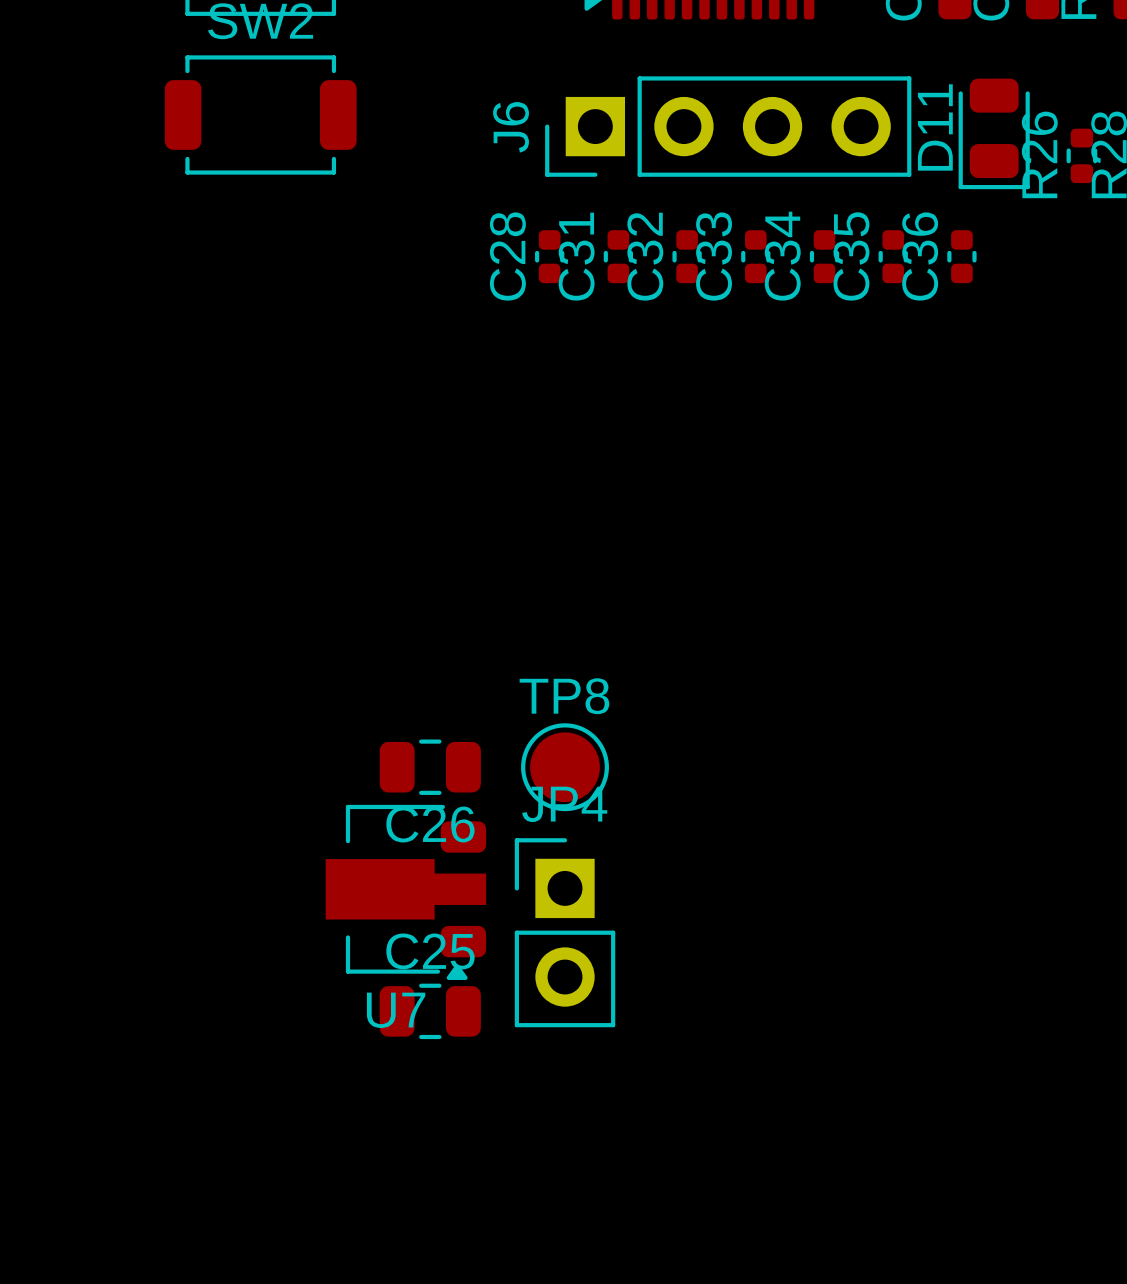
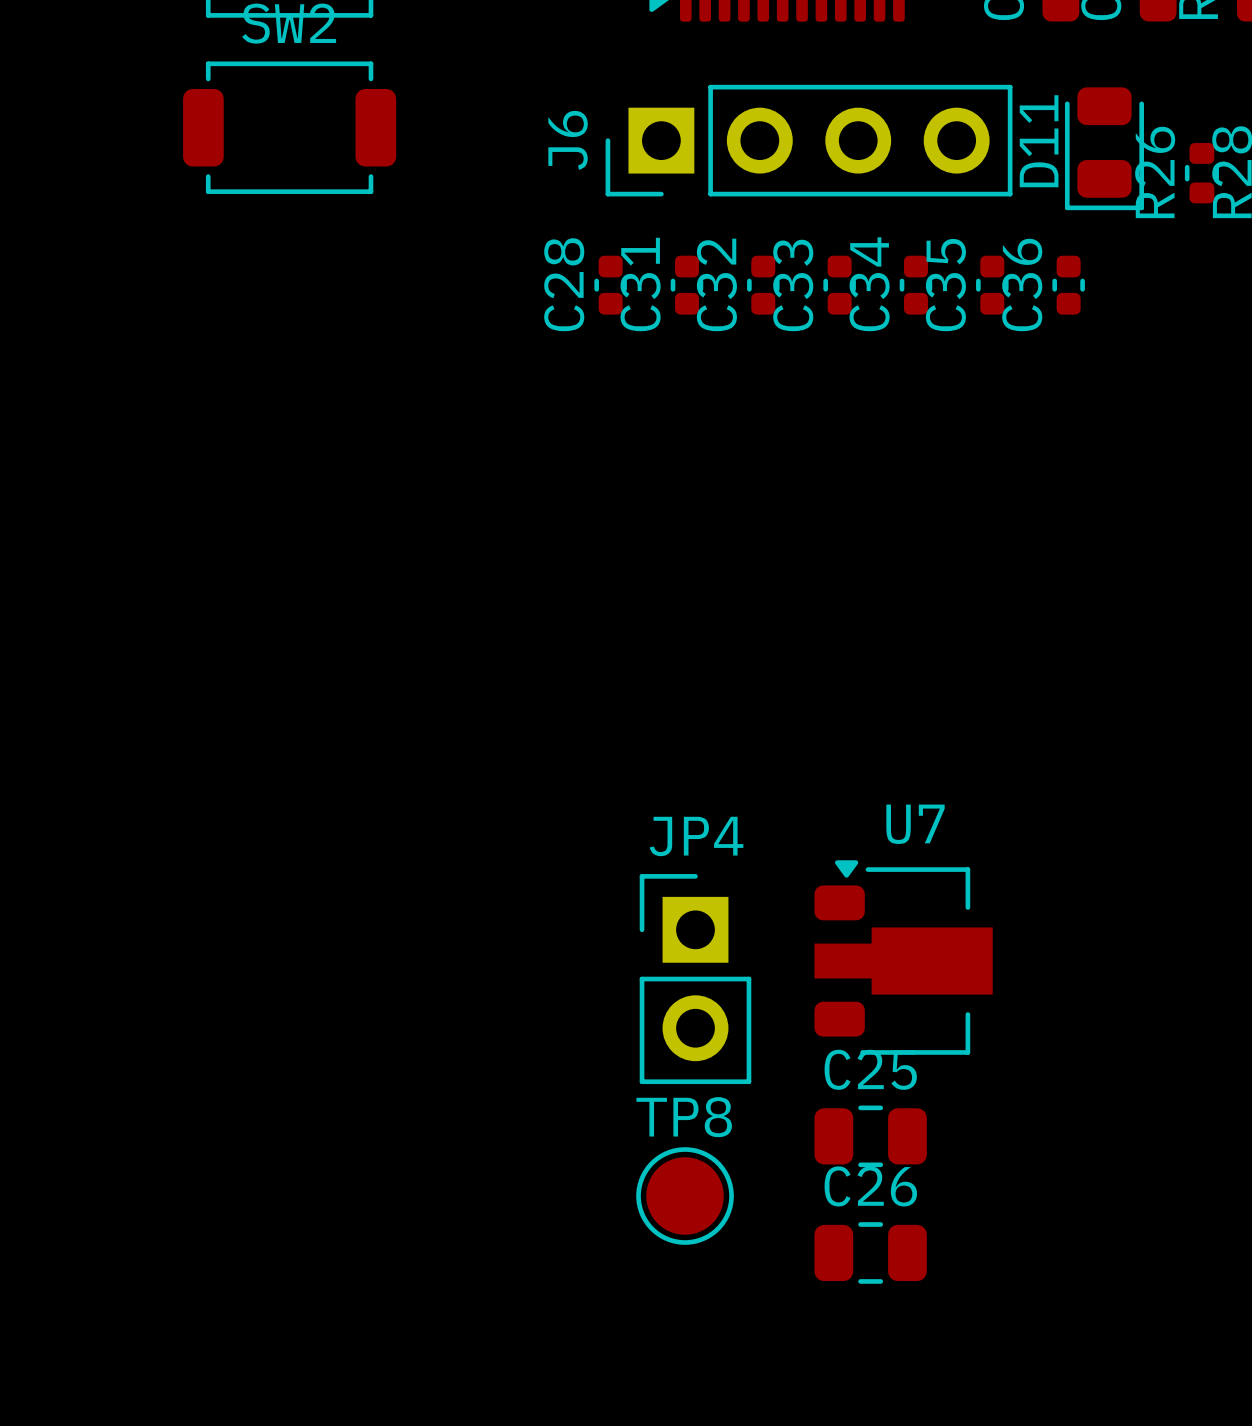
C26 position: (430, 767) -> (870, 1252)
TP8 position: (565, 767) -> (685, 1196)
C26 name position: C26 (430, 824) -> C26 (870, 1186)
U7 rotation: 0° (405, 892) -> 180° (903, 957)
U7 position: (405, 892) -> (903, 957)
JP4 position: (565, 932) -> (695, 979)
C25 position: (430, 1011) -> (870, 1136)

